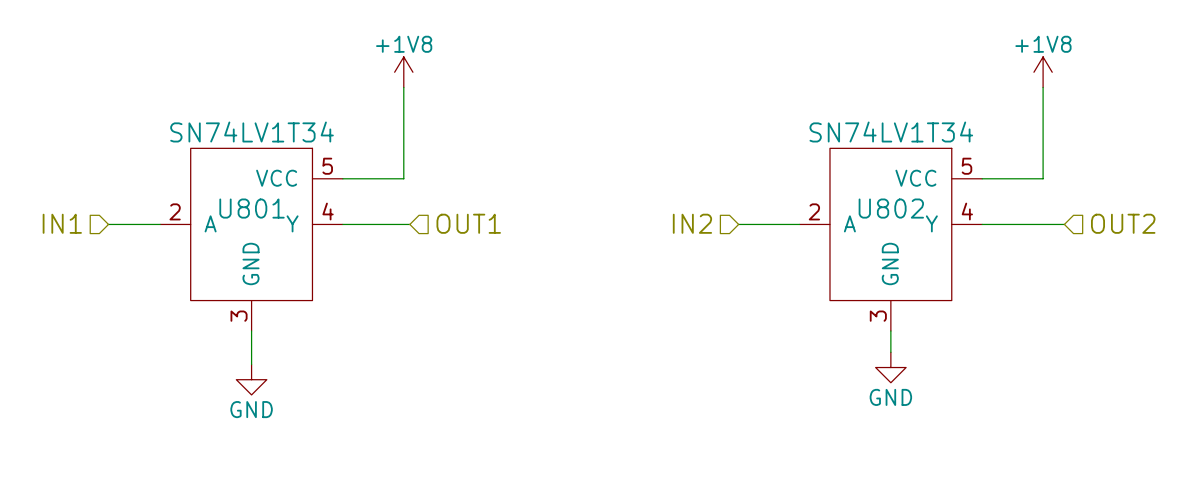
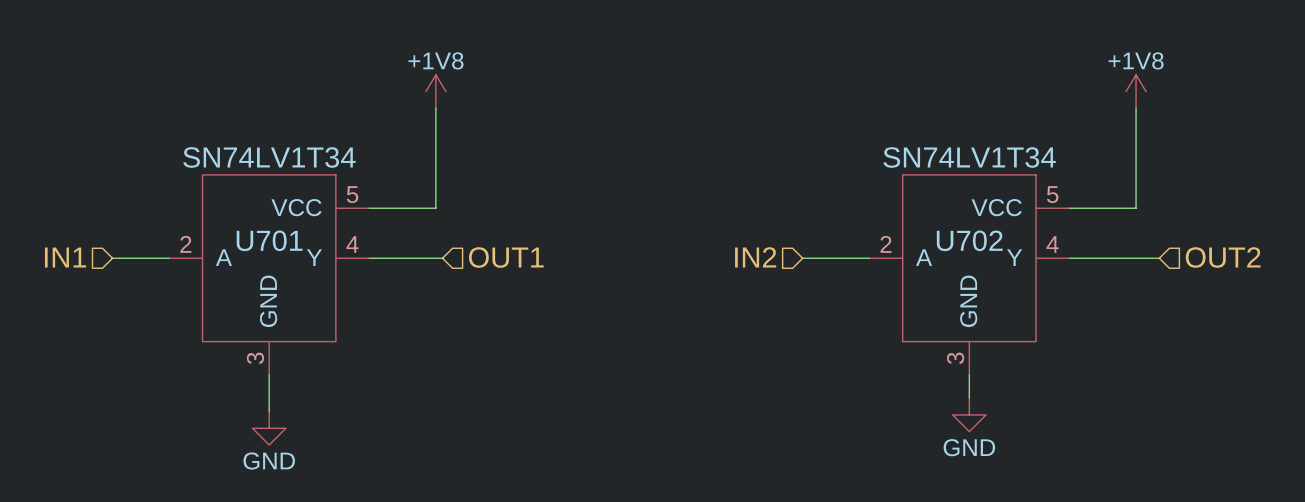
U801 name: U801 (252, 208) -> U701 (269, 240)
U802 name: U802 (891, 208) -> U702 (969, 240)

